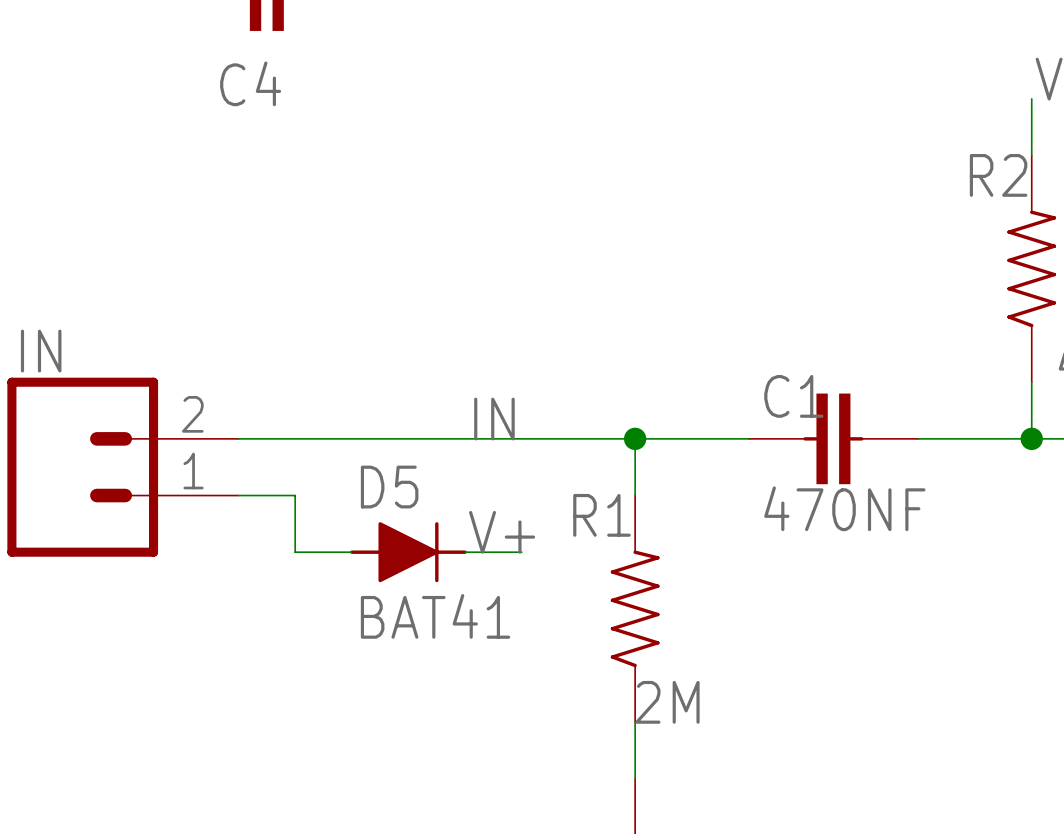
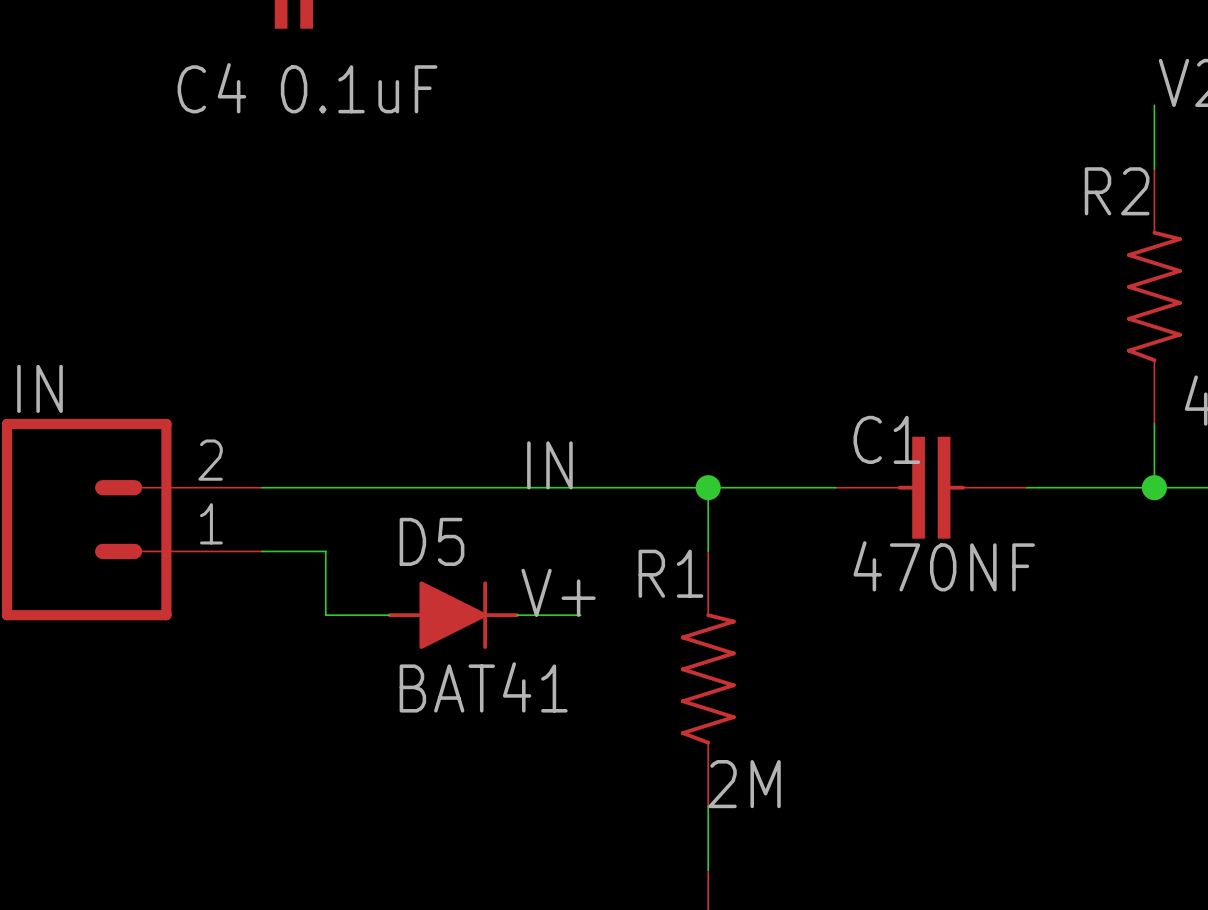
C4 name position: C4 (250, 83) -> C4 (211, 88)
C4 value: none -> 0.1uF (359, 89)

